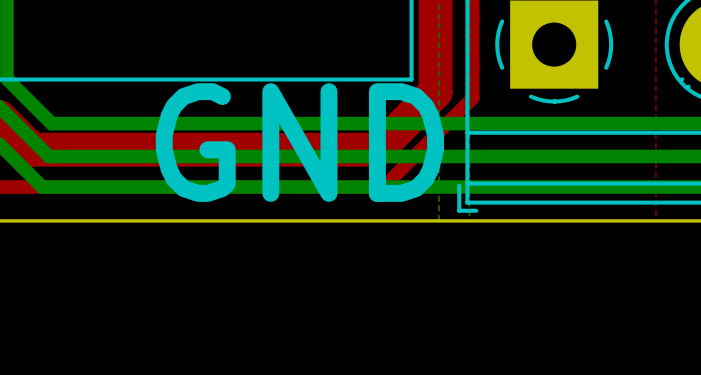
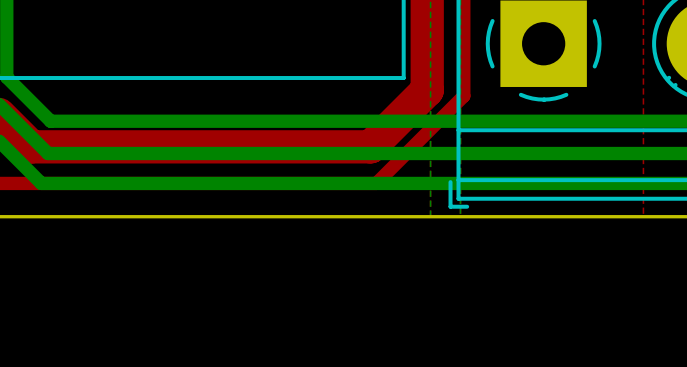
text: GND (299, 142) -> none

